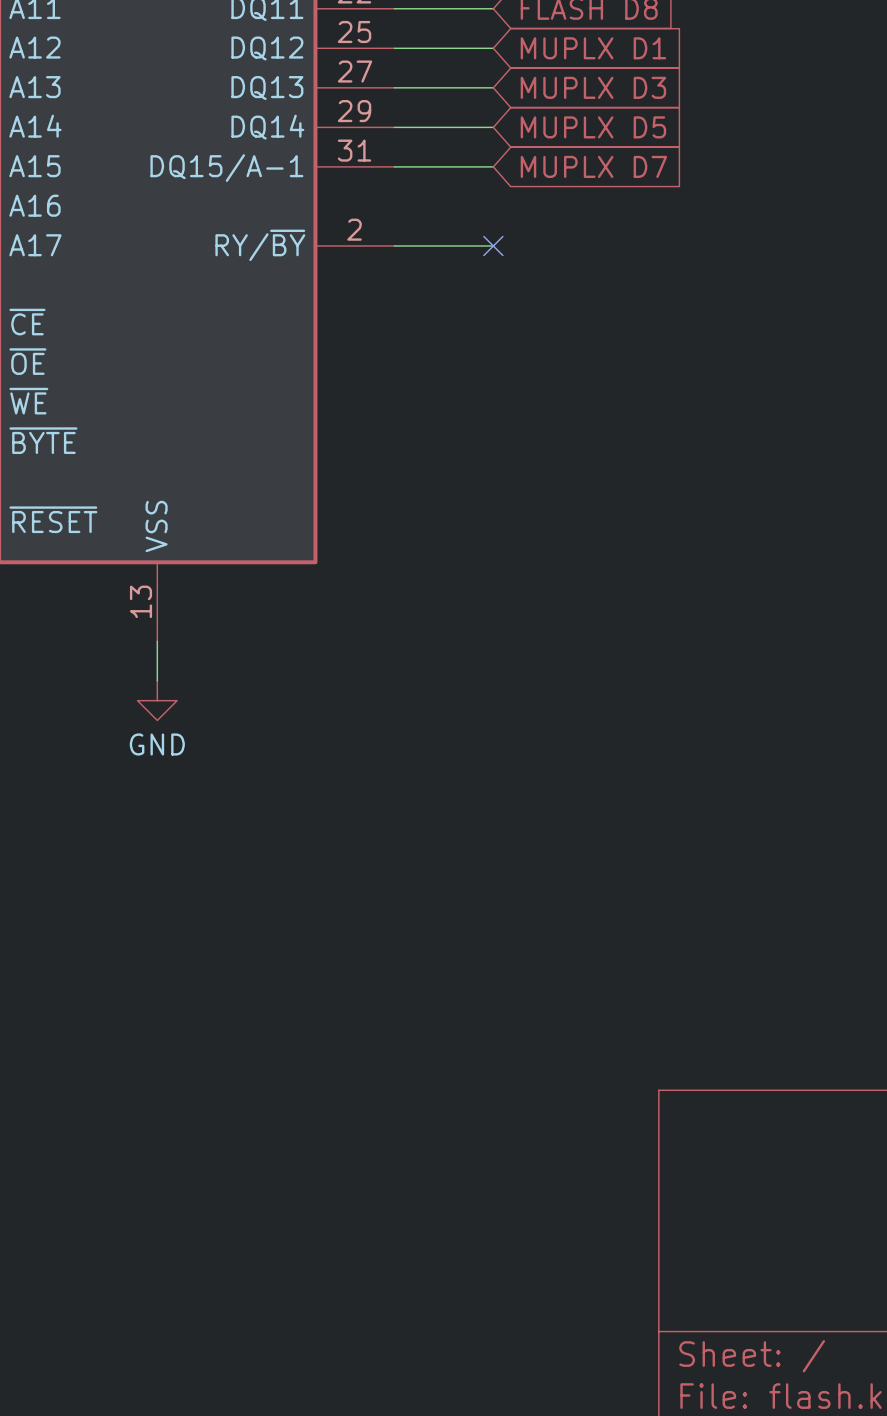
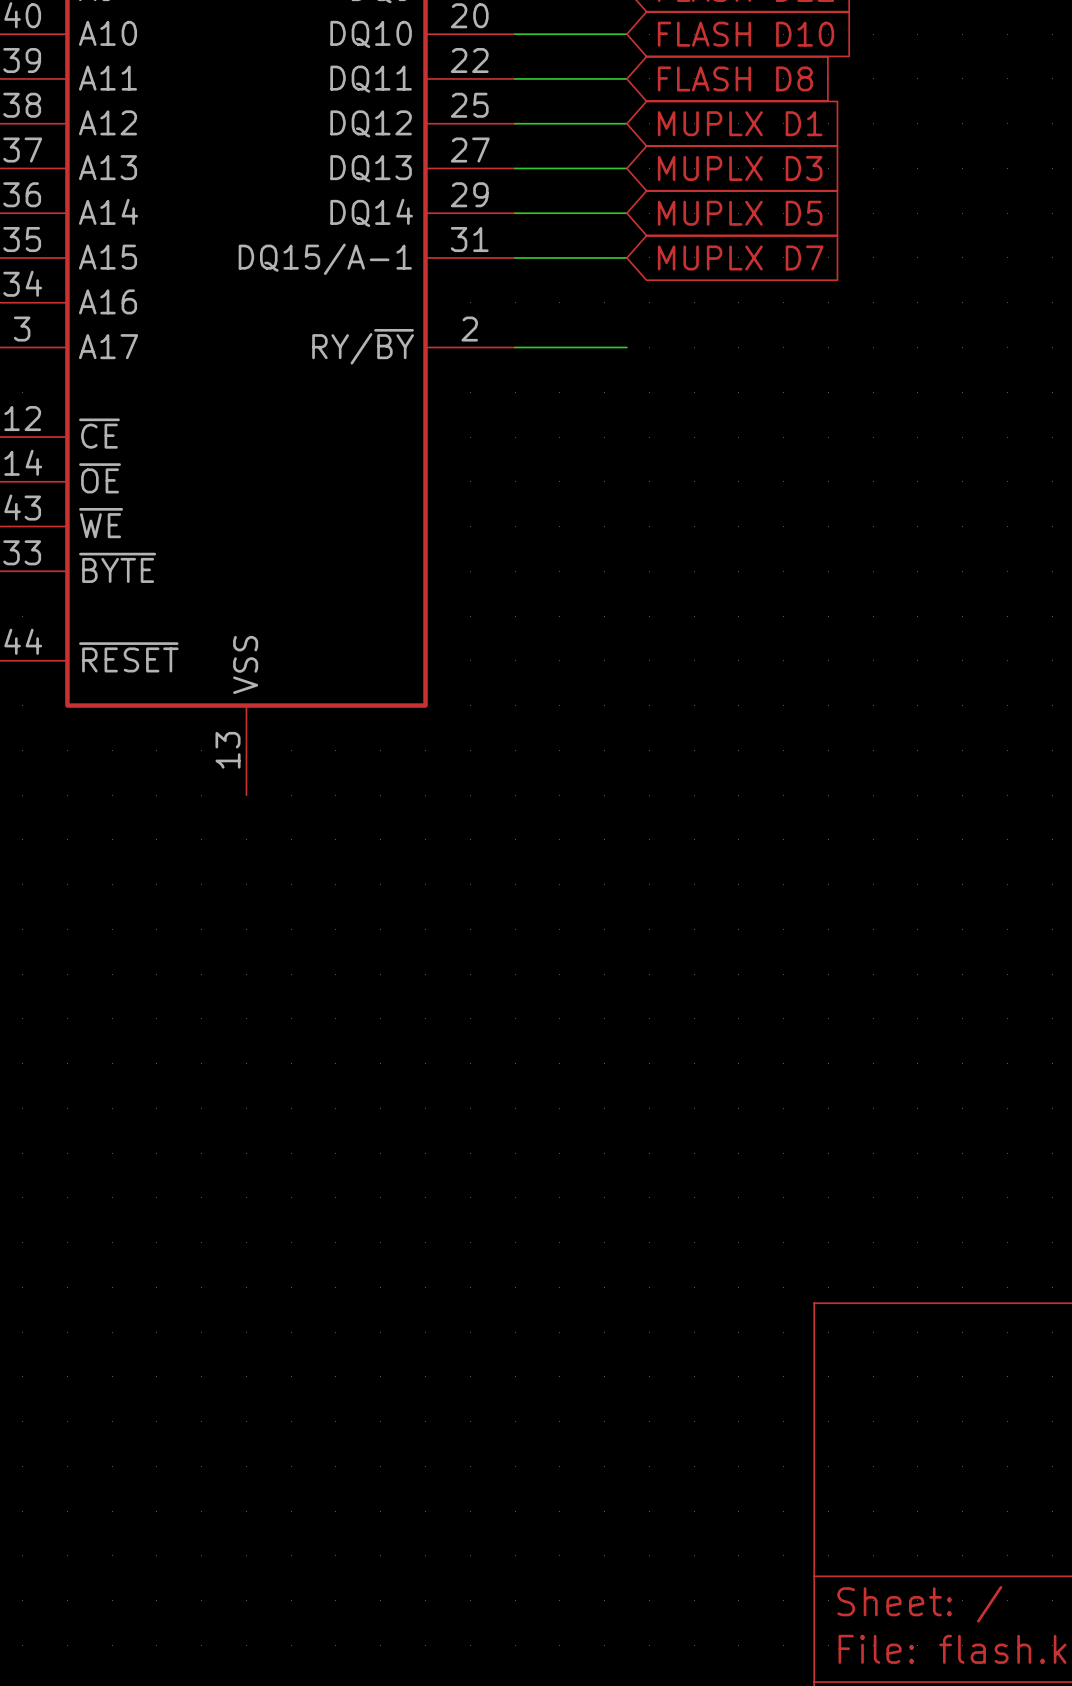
no-connect mark: (493, 245) -> none
wire: (157, 641) (157, 680) -> none
power symbol: GND (157, 700) -> none

